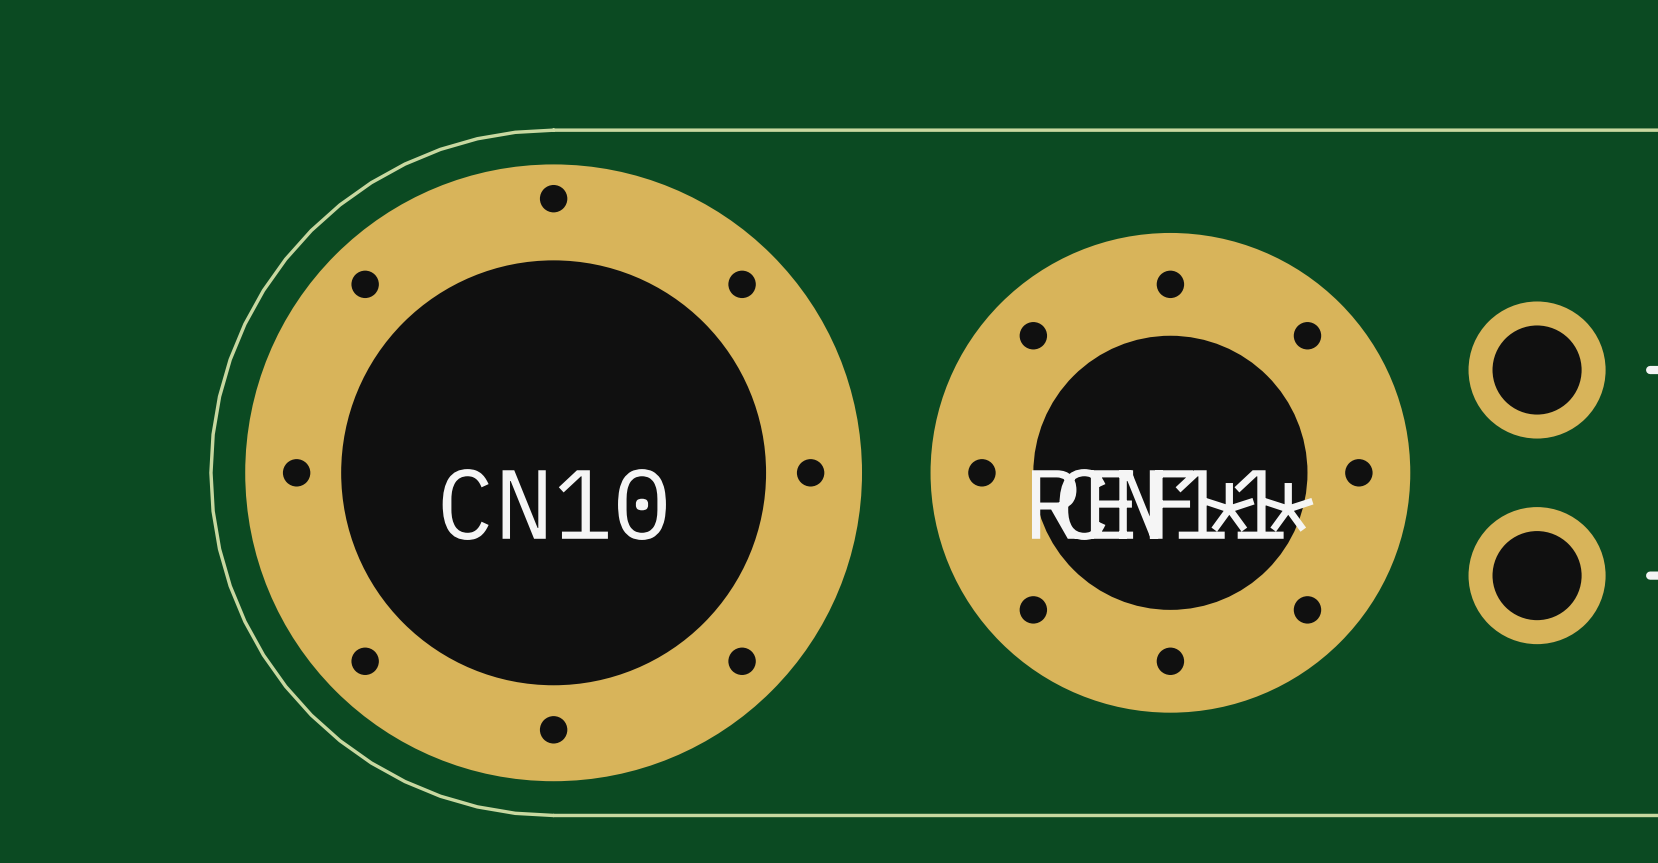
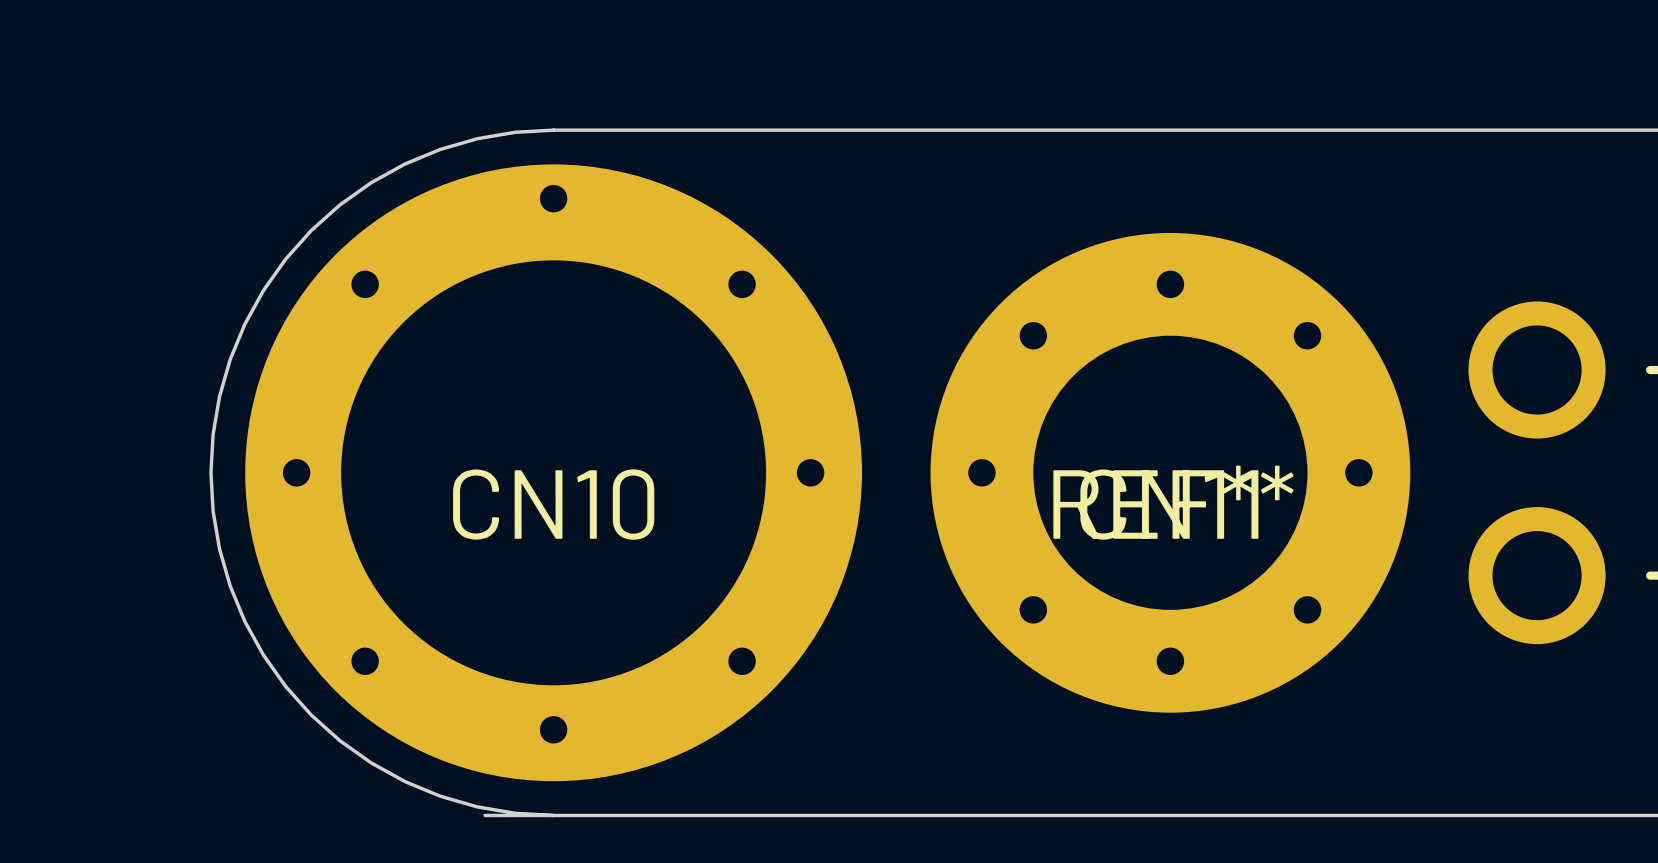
board edge: none -> (485, 815) (553, 815)

